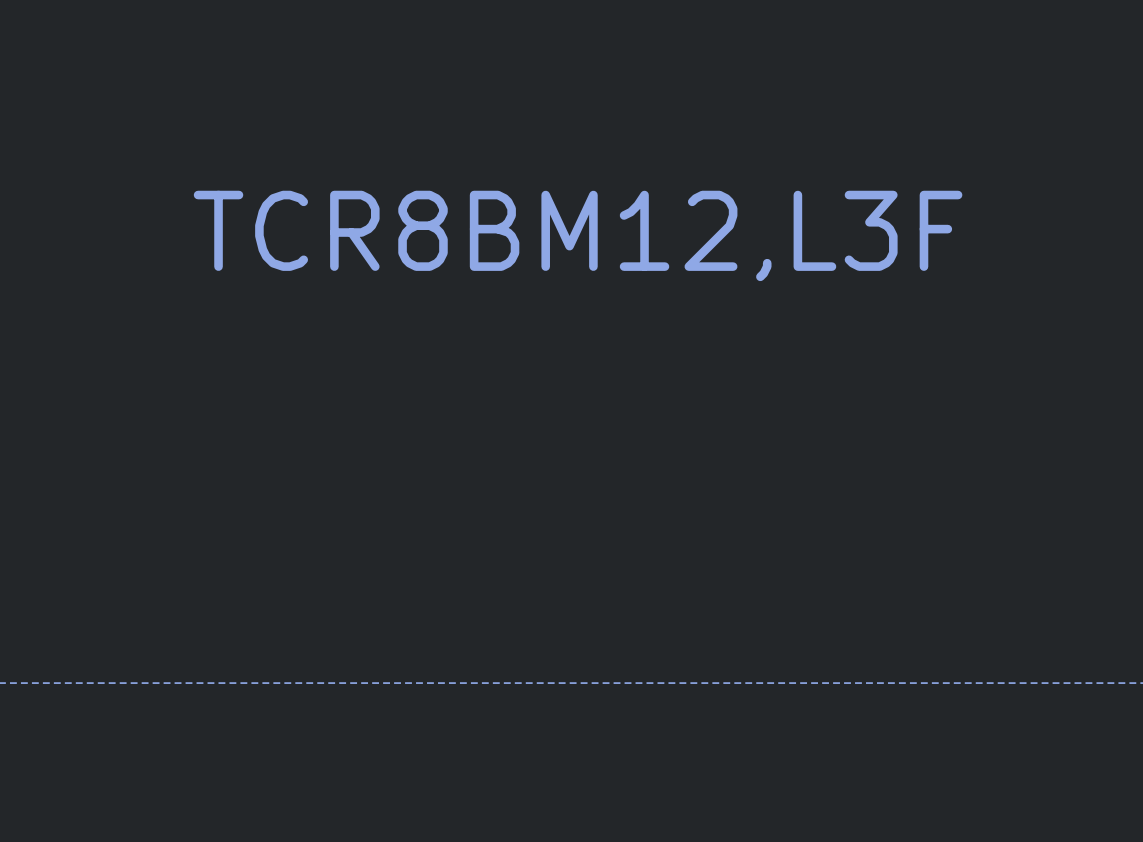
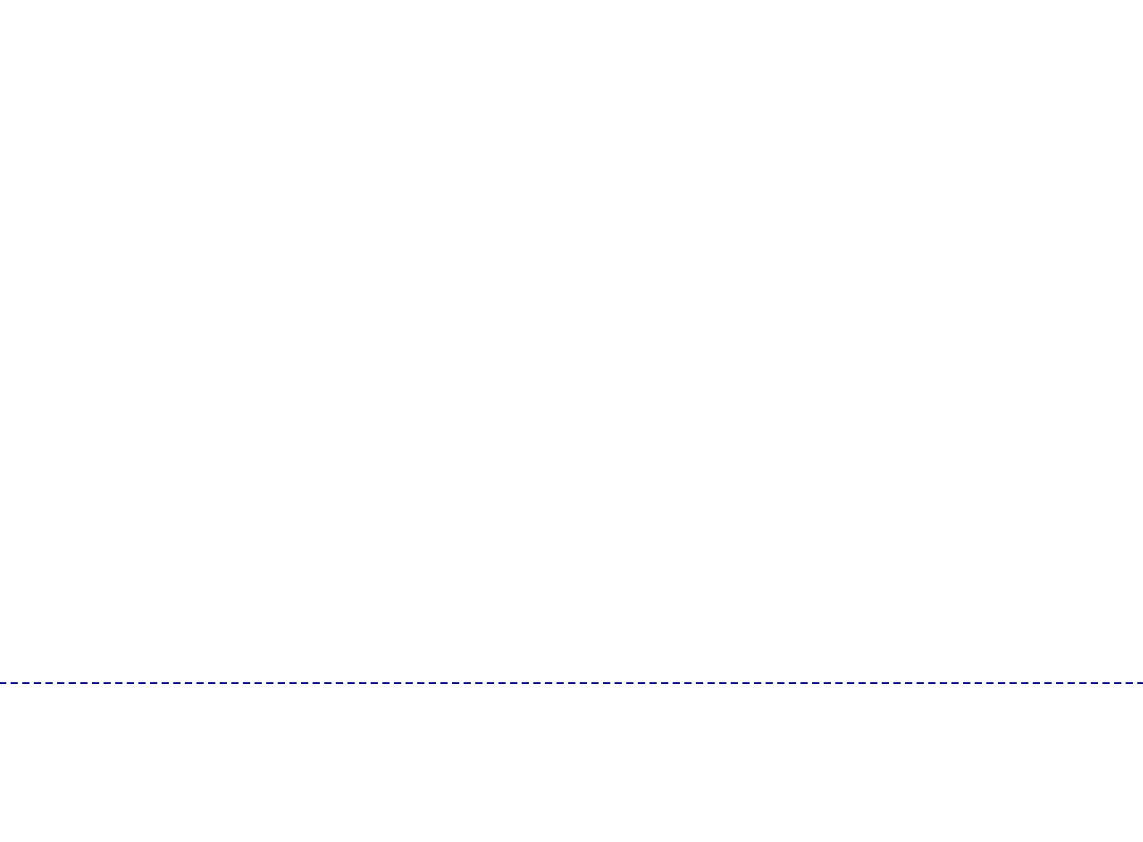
text: TCR8BM12,L3F (578, 235) -> none

